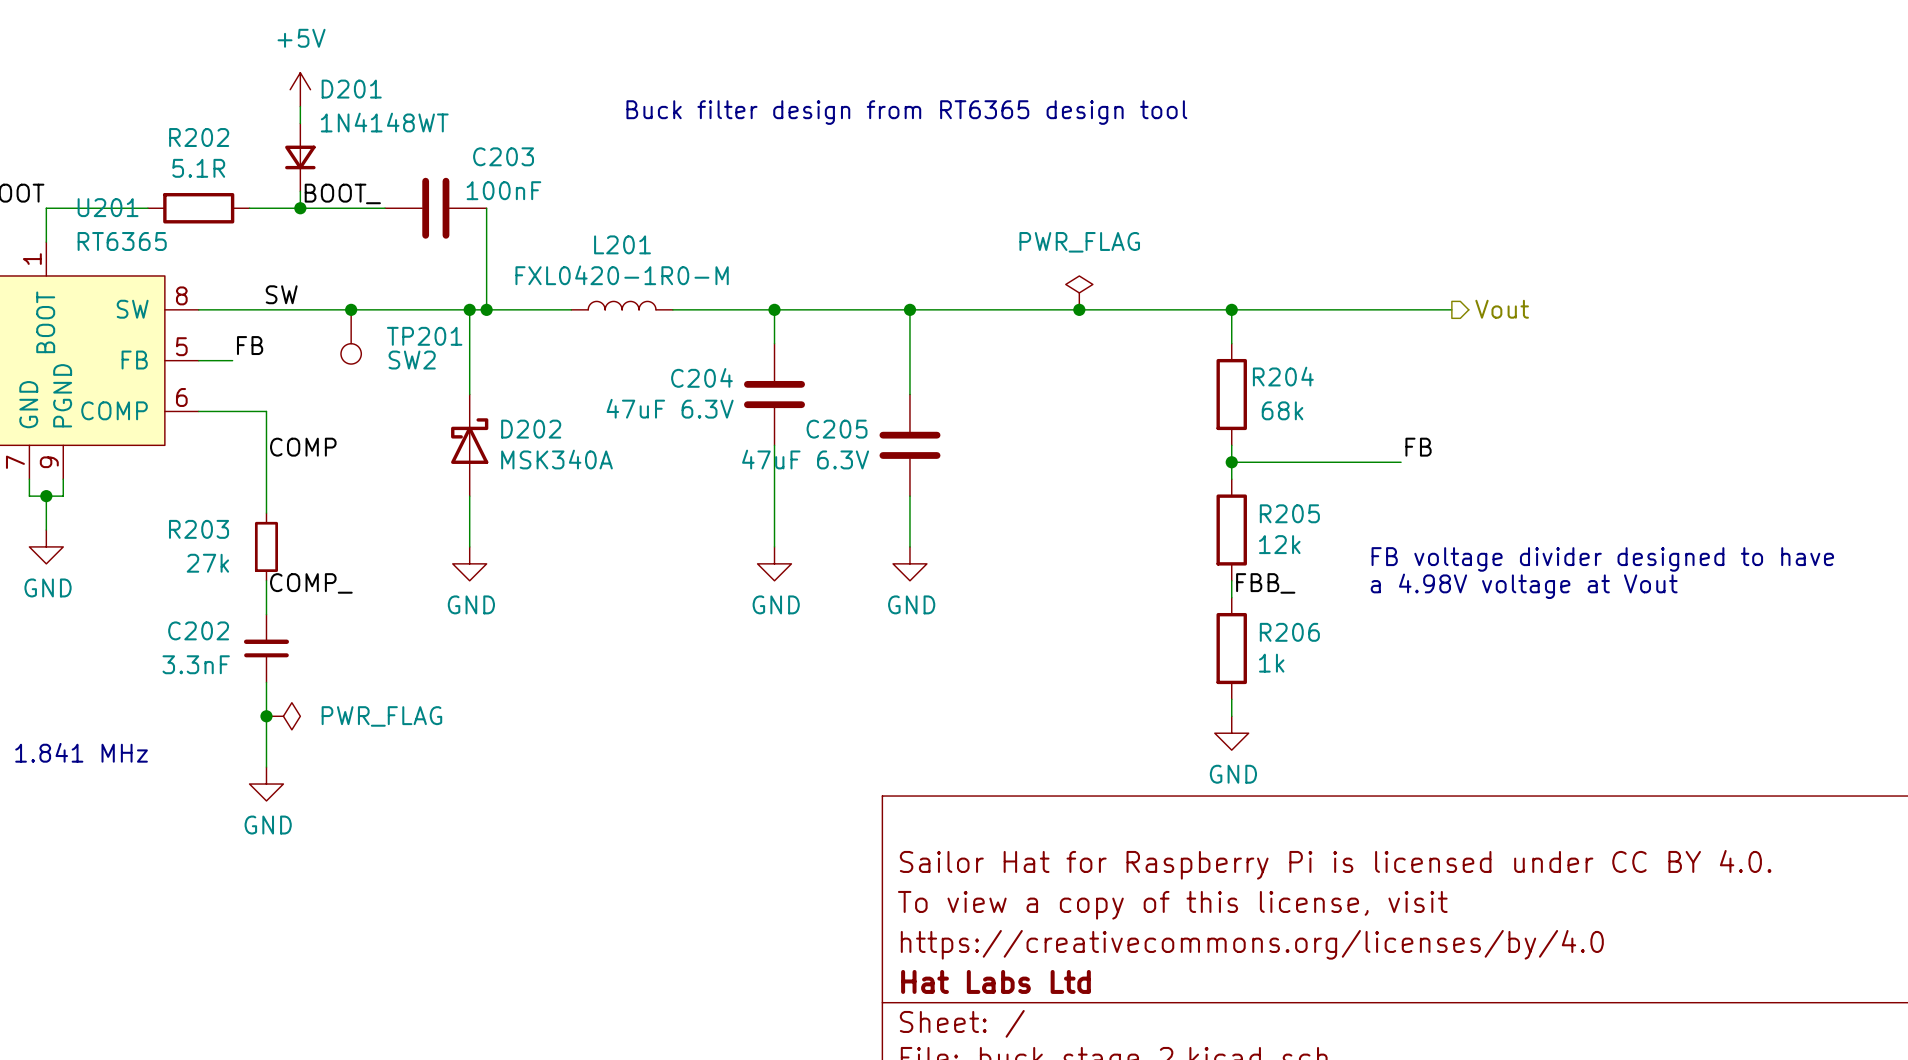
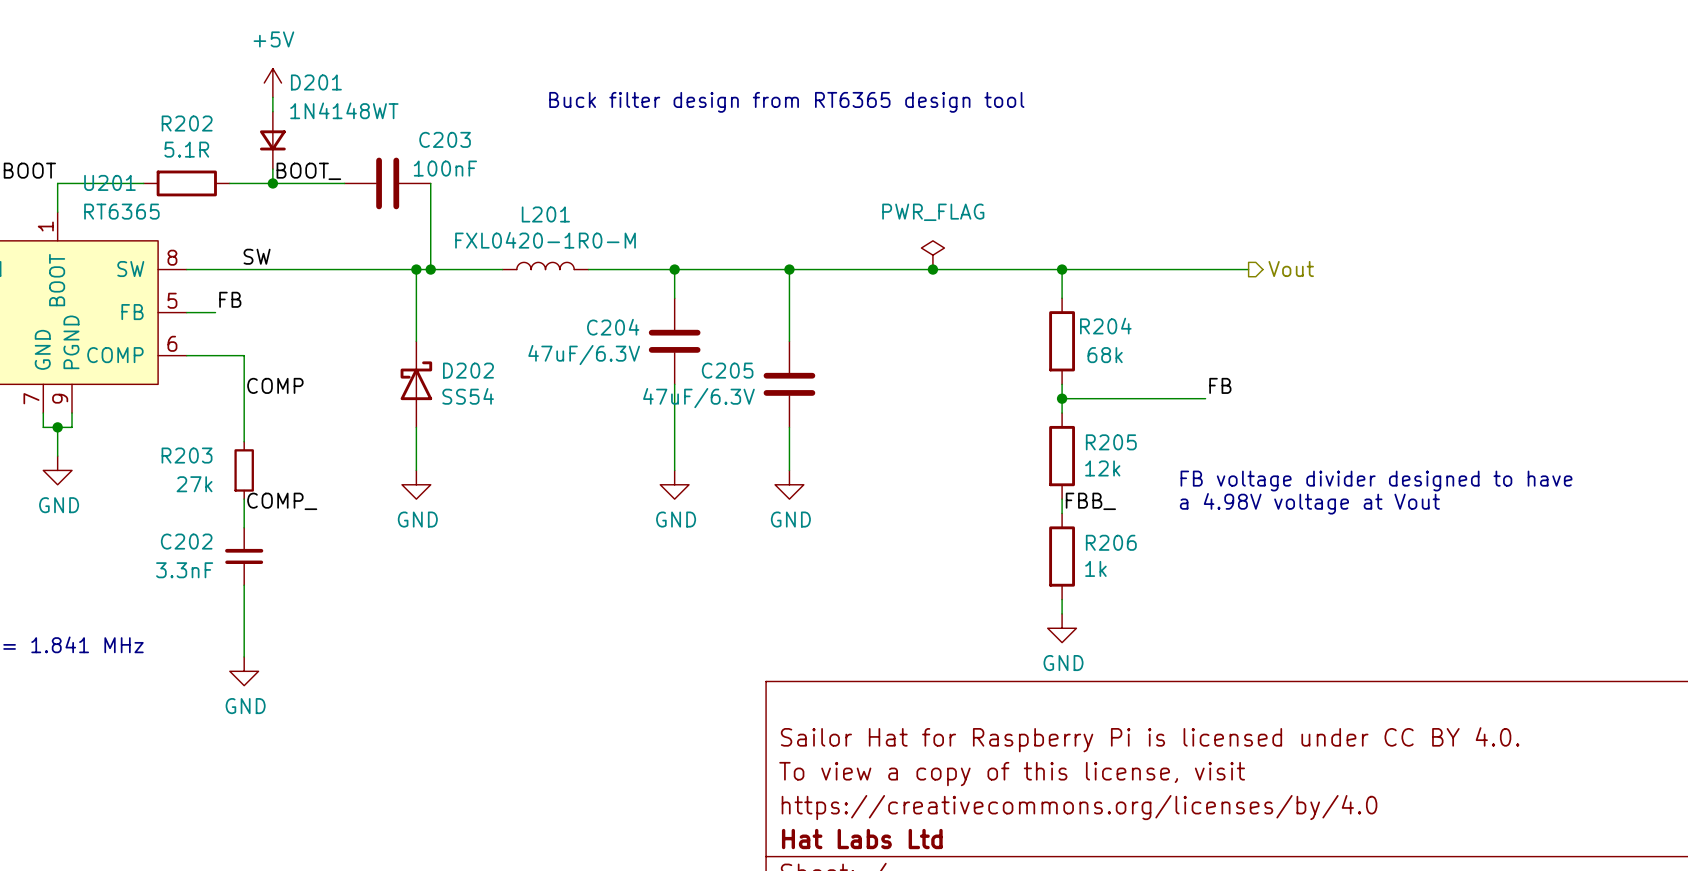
junction: (351, 309) -> none
TP201: SW2 (351, 336) -> none
C204 value: 47uF 6.3V (670, 408) -> 47uF/6.3V (584, 355)
D202 value: MSK340A (556, 459) -> SS54 (468, 396)
C205 value: 47uF 6.3V (805, 459) -> 47uF/6.3V (698, 398)
junction: (266, 716) -> none
power symbol: PWR_FLAG (283, 716) -> none

